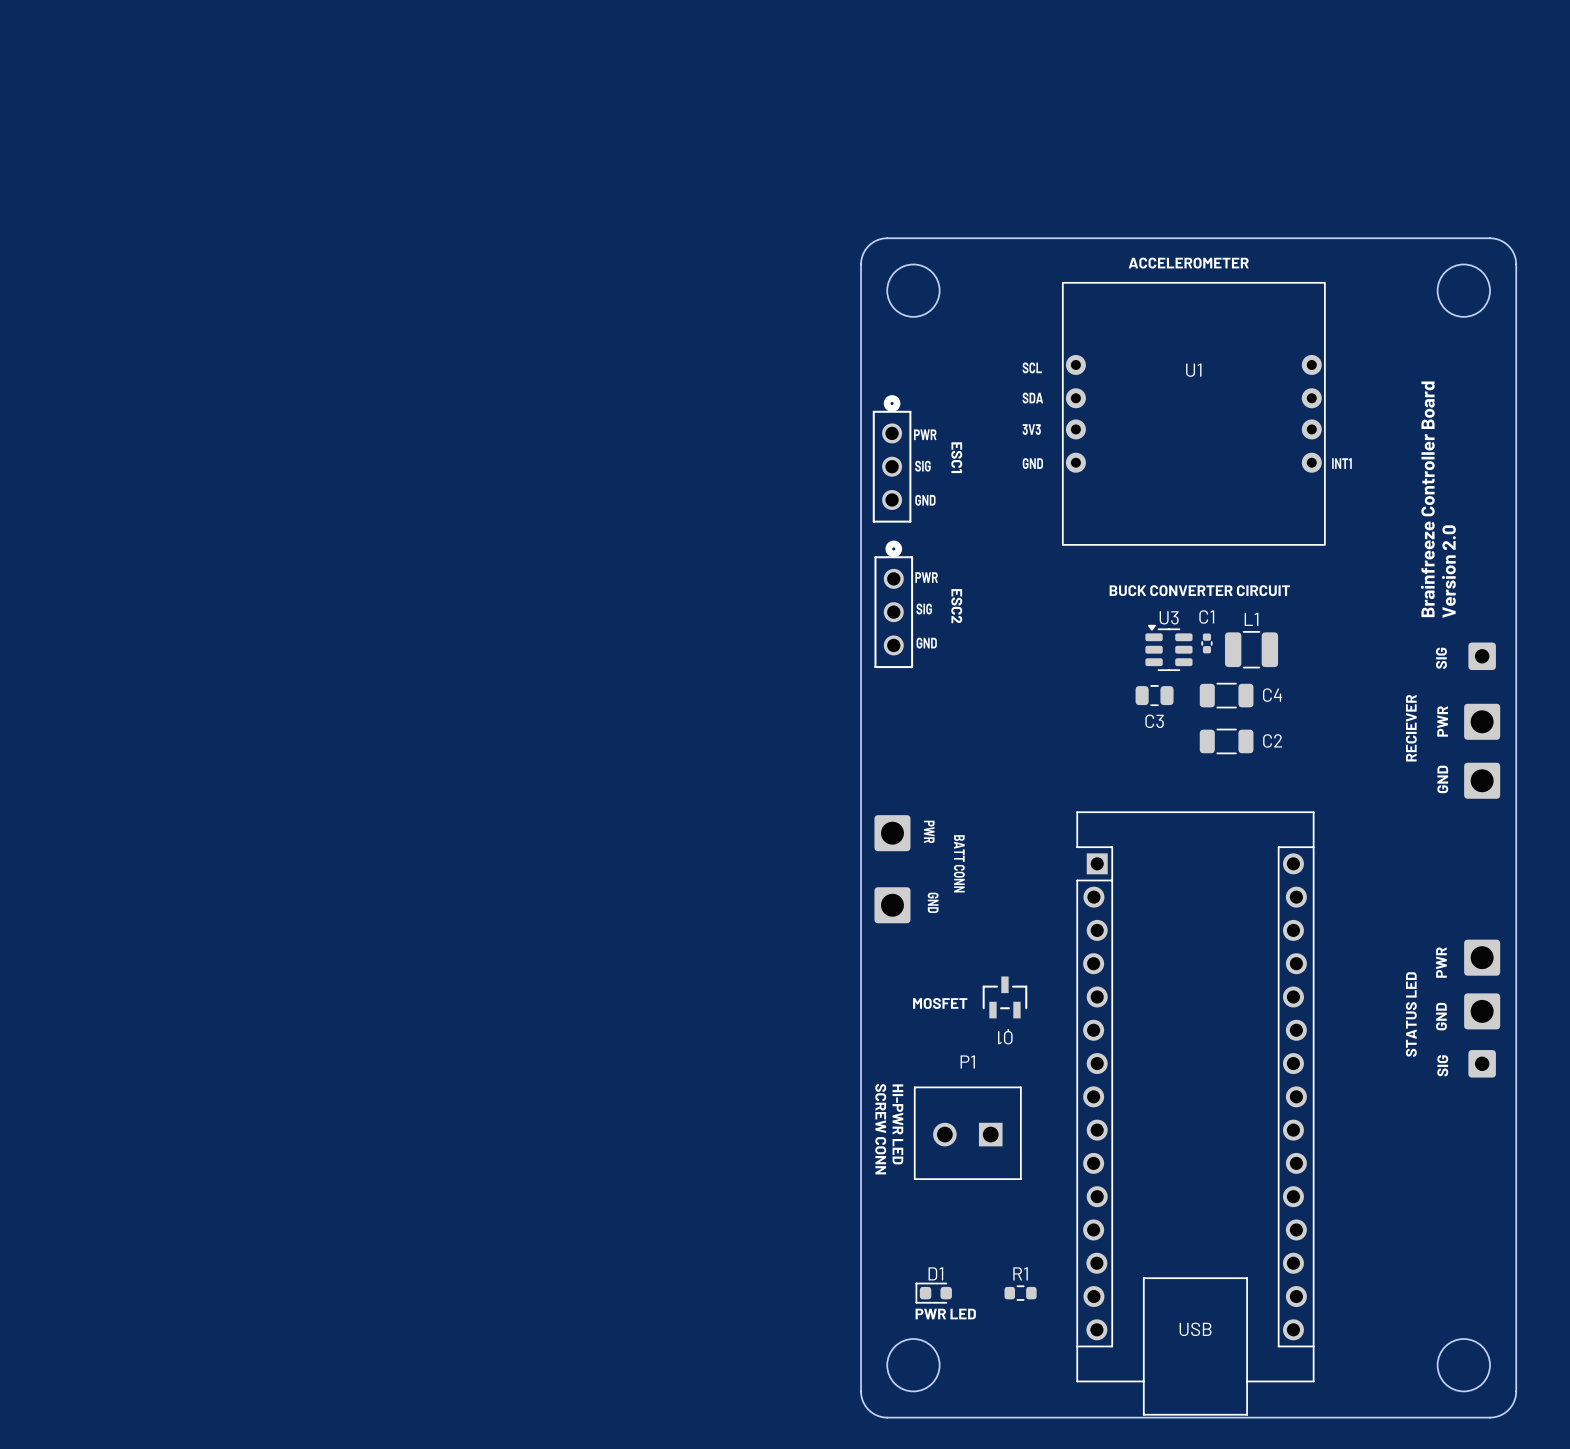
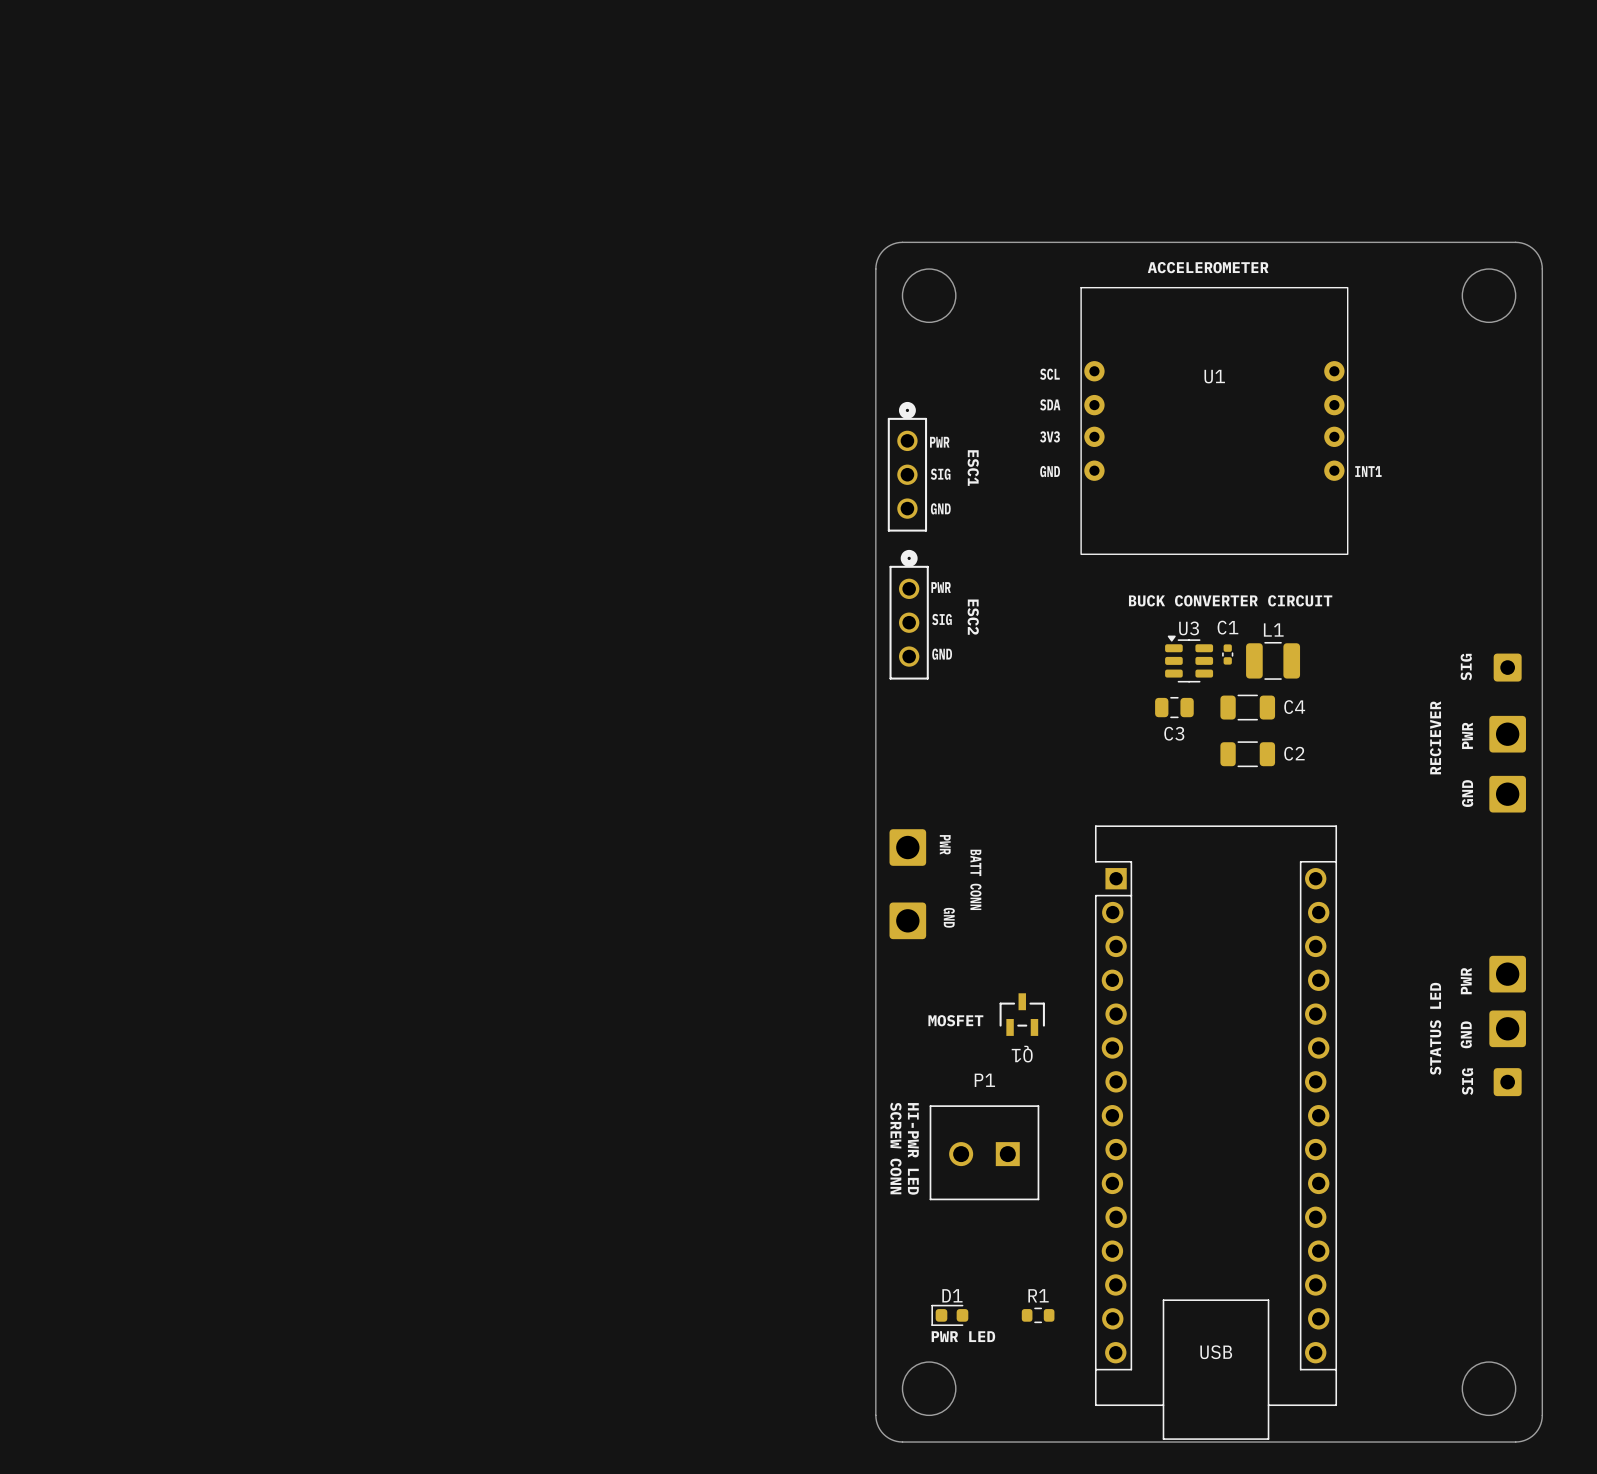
text: Brainfreeze Controller Board (1427, 499) -> none
text: Version 2.0 (1448, 571) -> none

